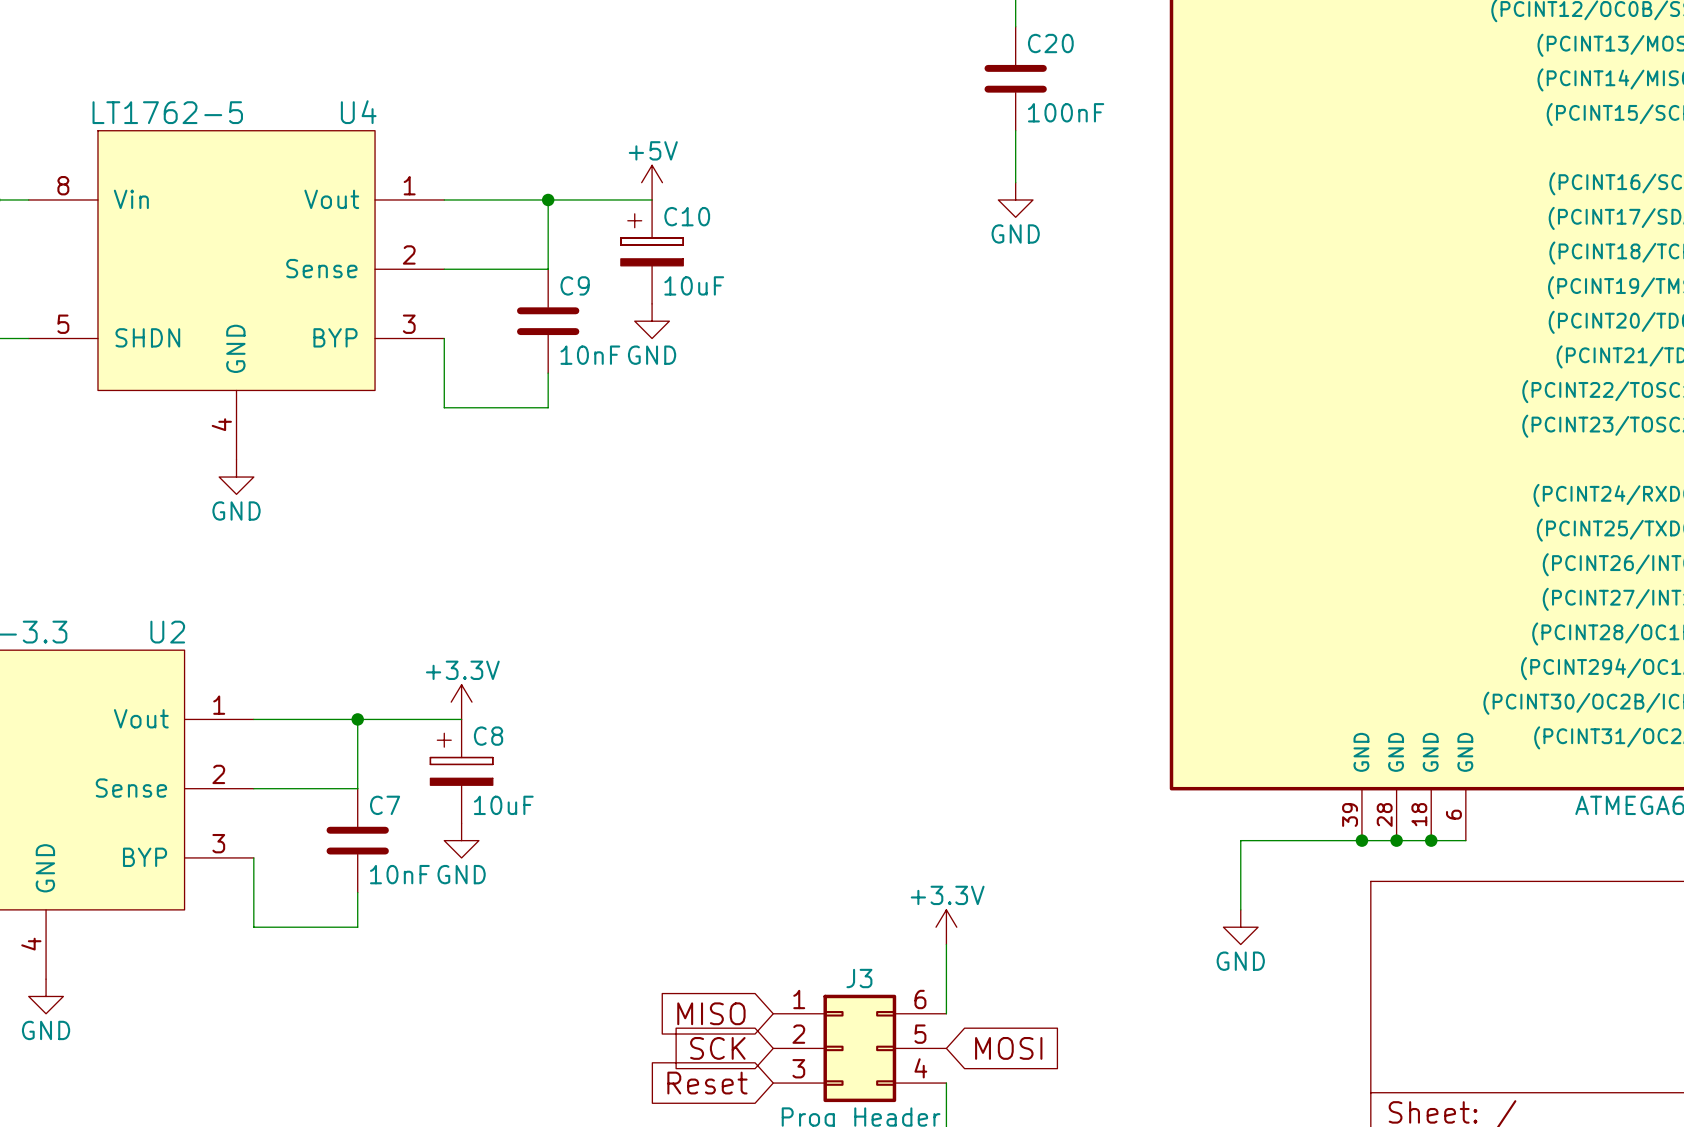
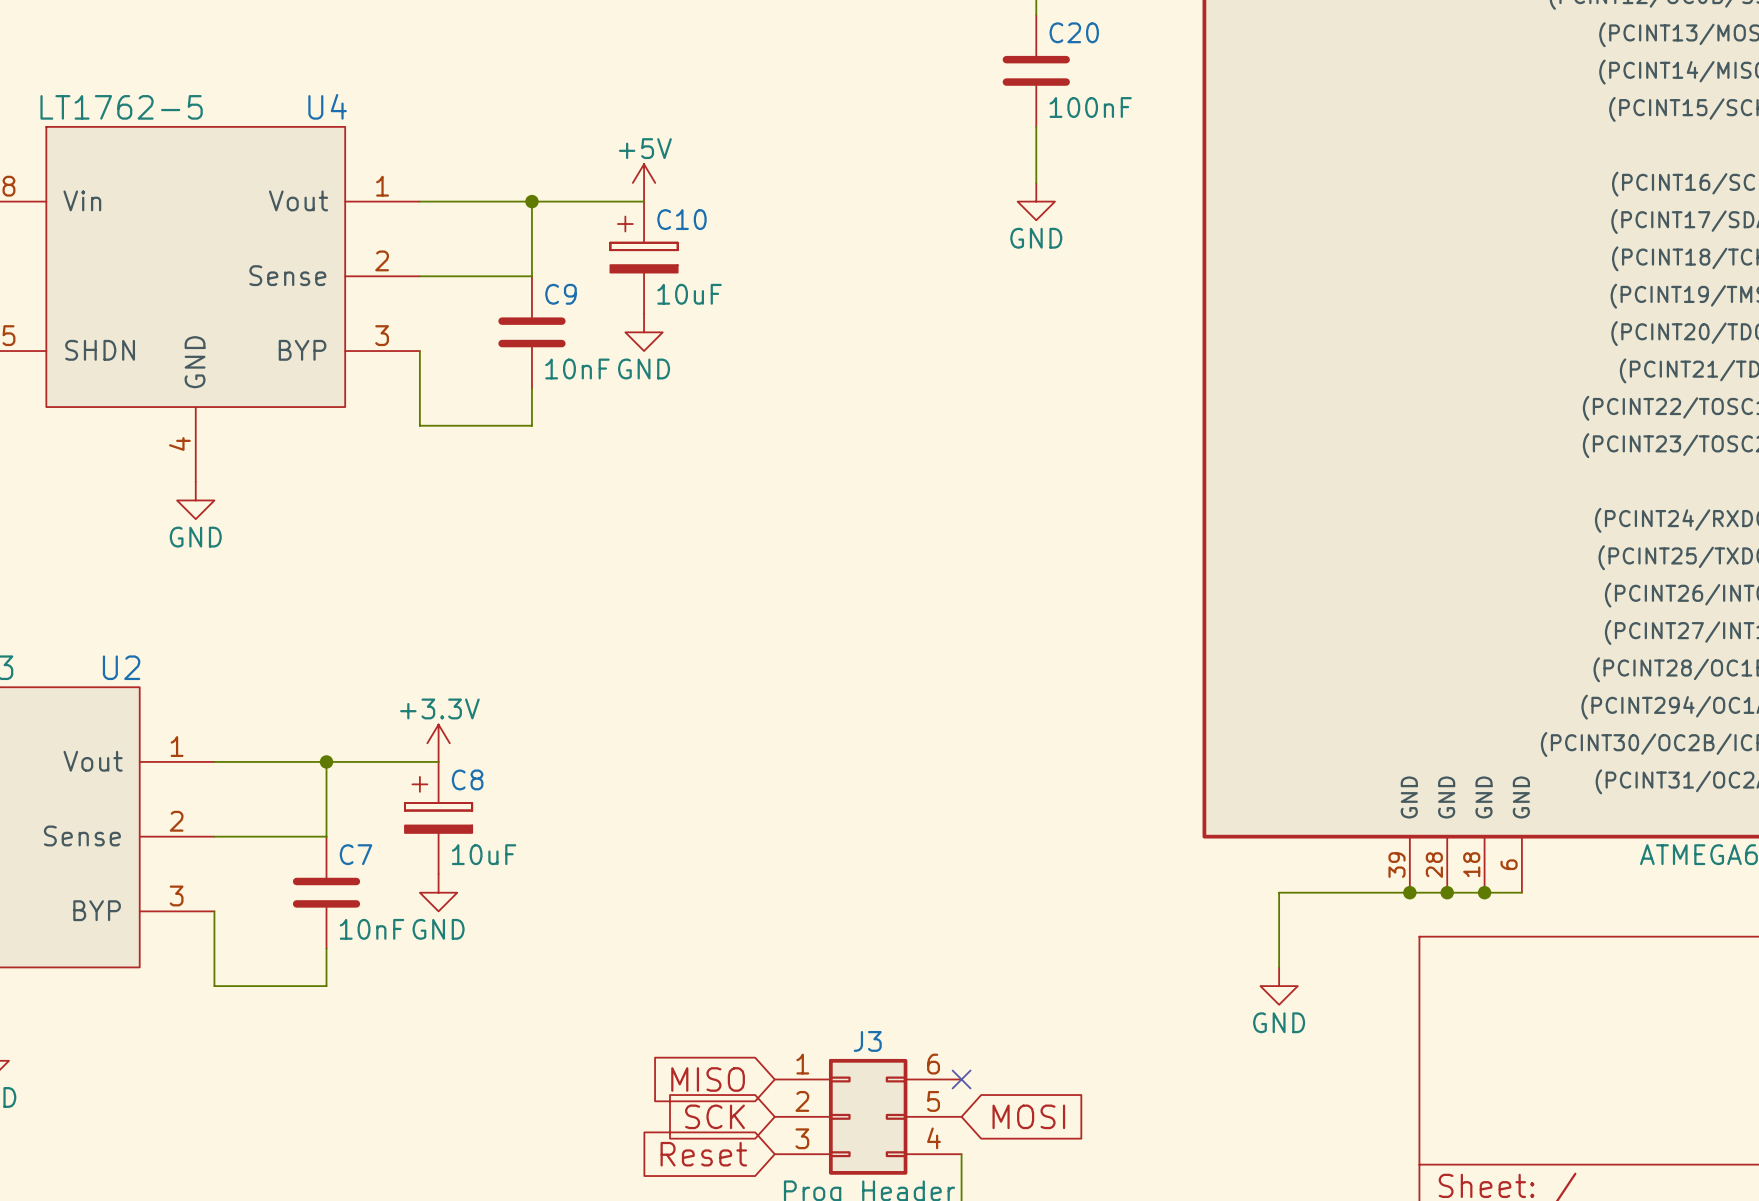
power symbol: +3.3V (946, 927) -> none
wire: (946, 944) (946, 1013) -> none
no-connect mark: none -> (961, 1079)

